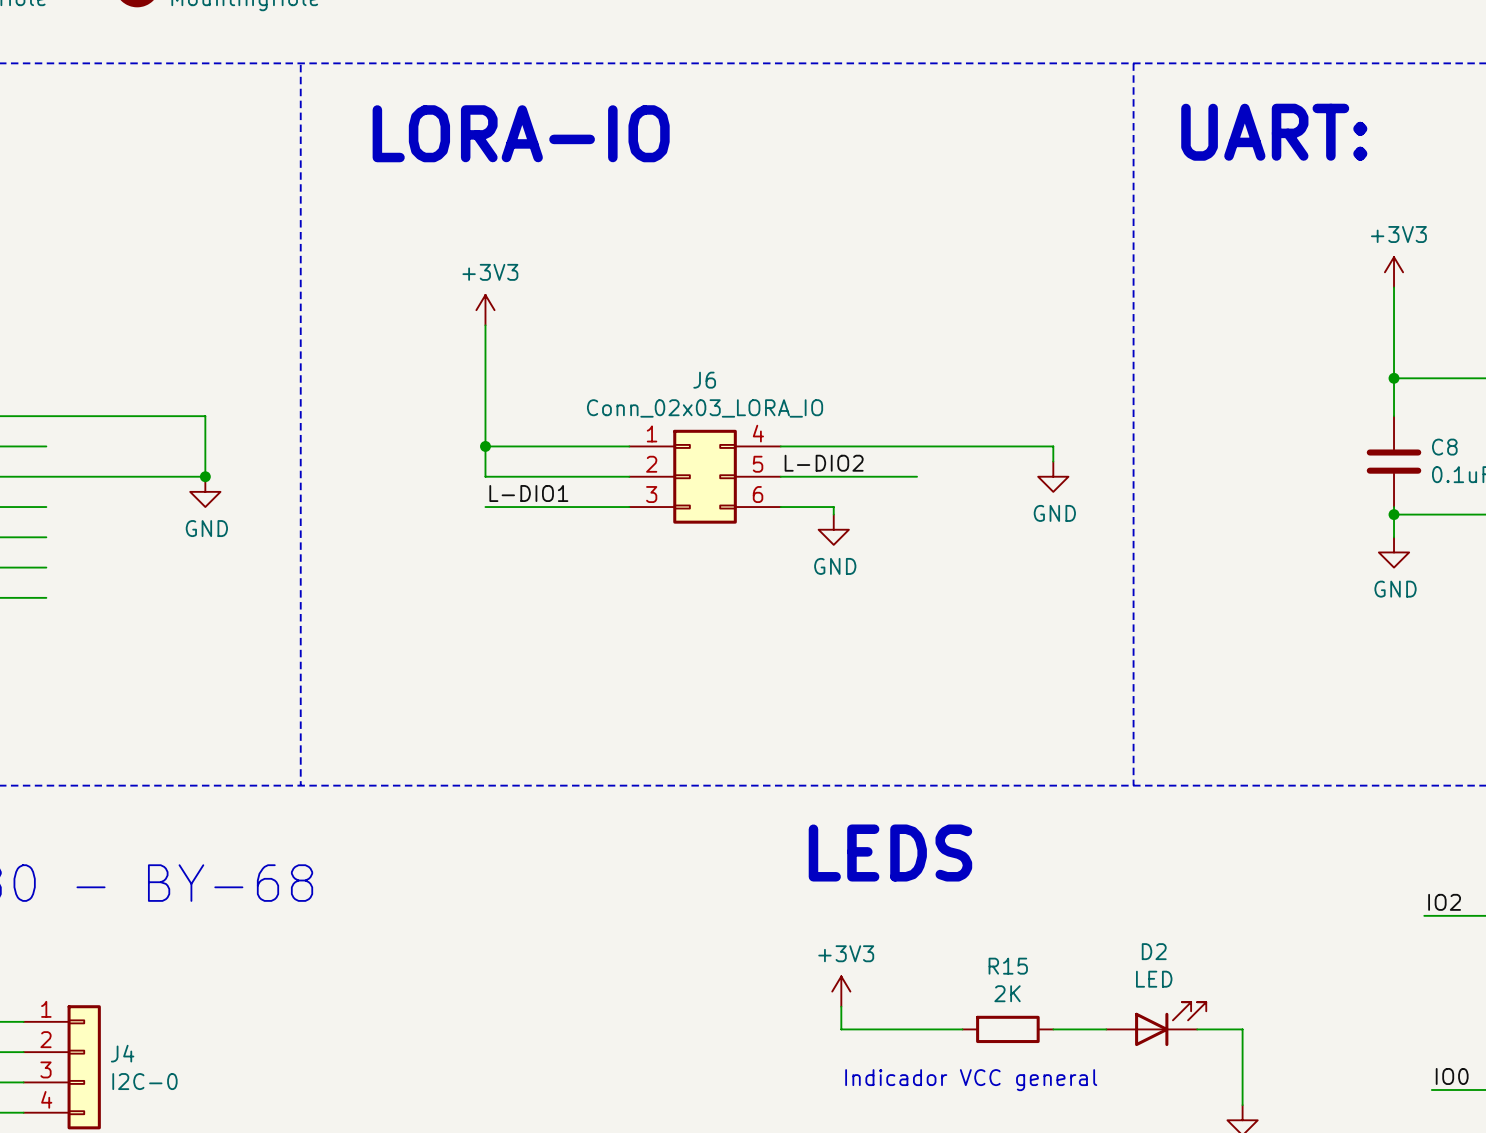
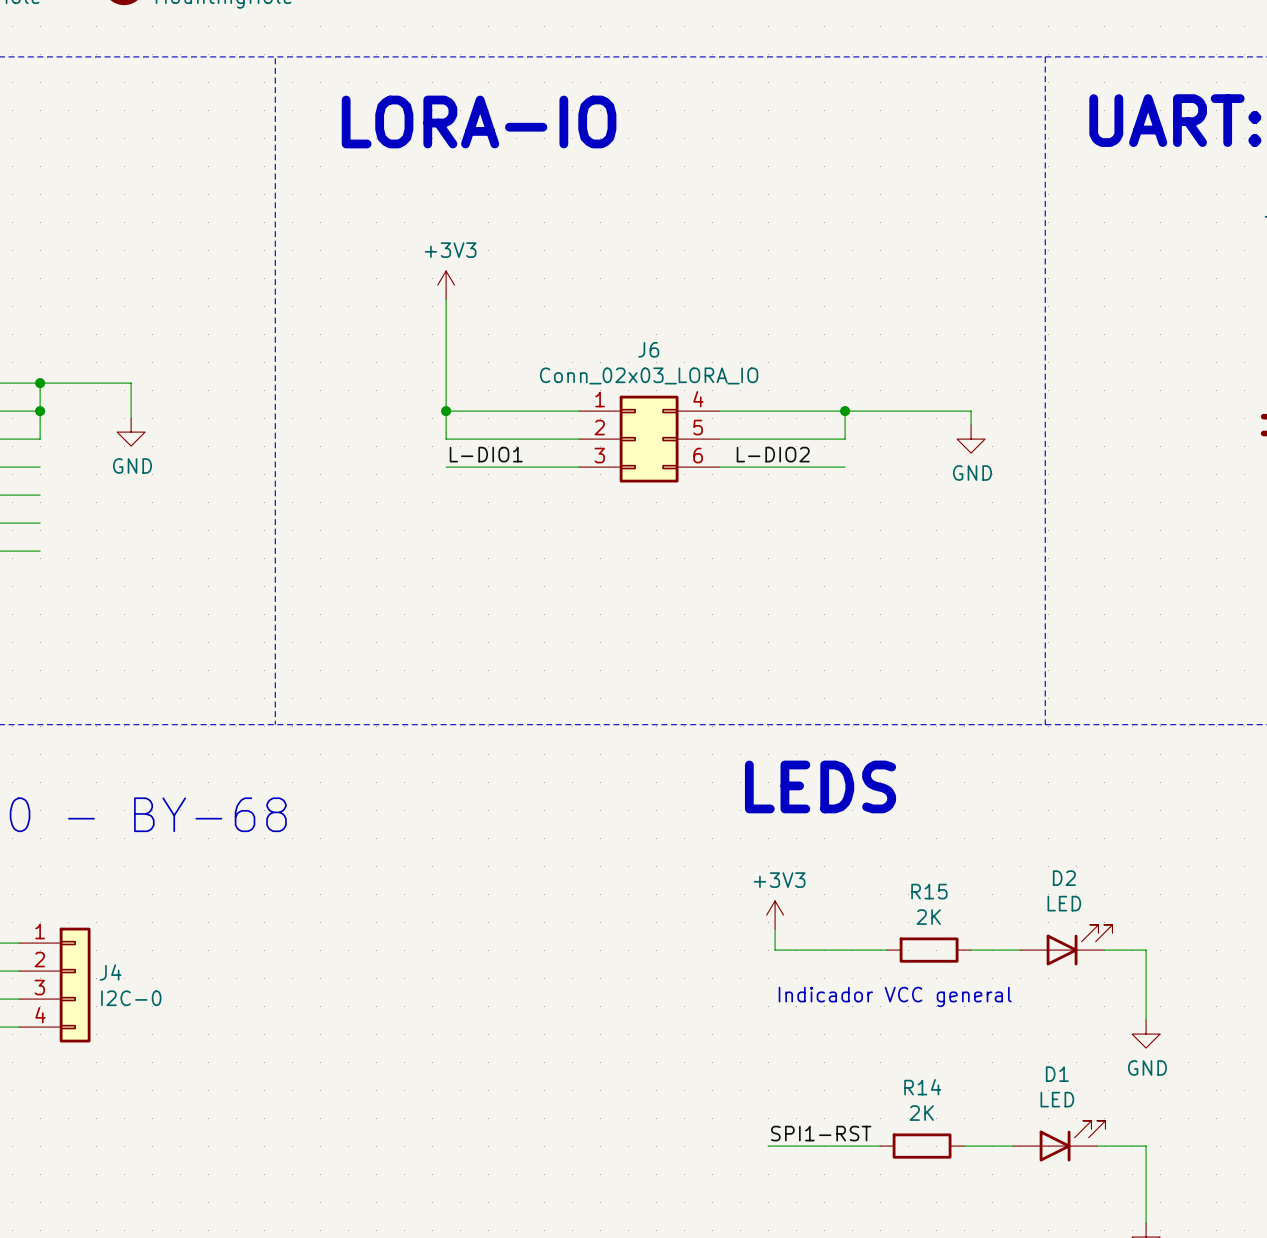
junction: none -> (40, 383)
wire: (144, 416) (205, 416) (205, 476) (46, 476) -> (40, 383) (40, 439)
wire: none -> (131, 383) (131, 418)
junction: none -> (40, 411)
wire: none -> (845, 411) (845, 439)
junction: none -> (845, 411)
label position: L-DIO2 (824, 463) -> L-DIO2 (773, 454)
junction: (205, 476) -> none
power symbol position: GND (205, 491) -> GND (131, 432)
wire: (833, 507) (833, 514) -> (768, 467) (845, 467)
power symbol: GND (833, 529) -> none

